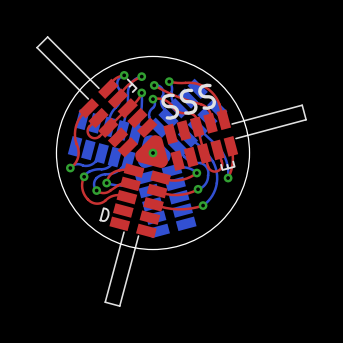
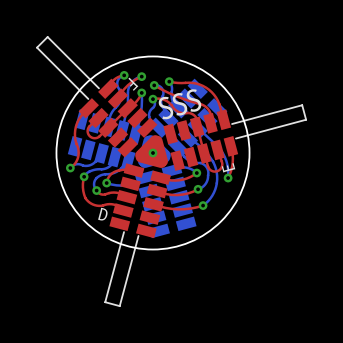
top track: (84, 176) (82, 191) (92, 202) (100, 203) (115, 195) (126, 197) -> (84, 176) (83, 191) (87, 201) (96, 205) (113, 204) (123, 210)
top track: (130, 183) (120, 184) (106, 192) (96, 190) -> (126, 197) (116, 192) (102, 194) (96, 190)

